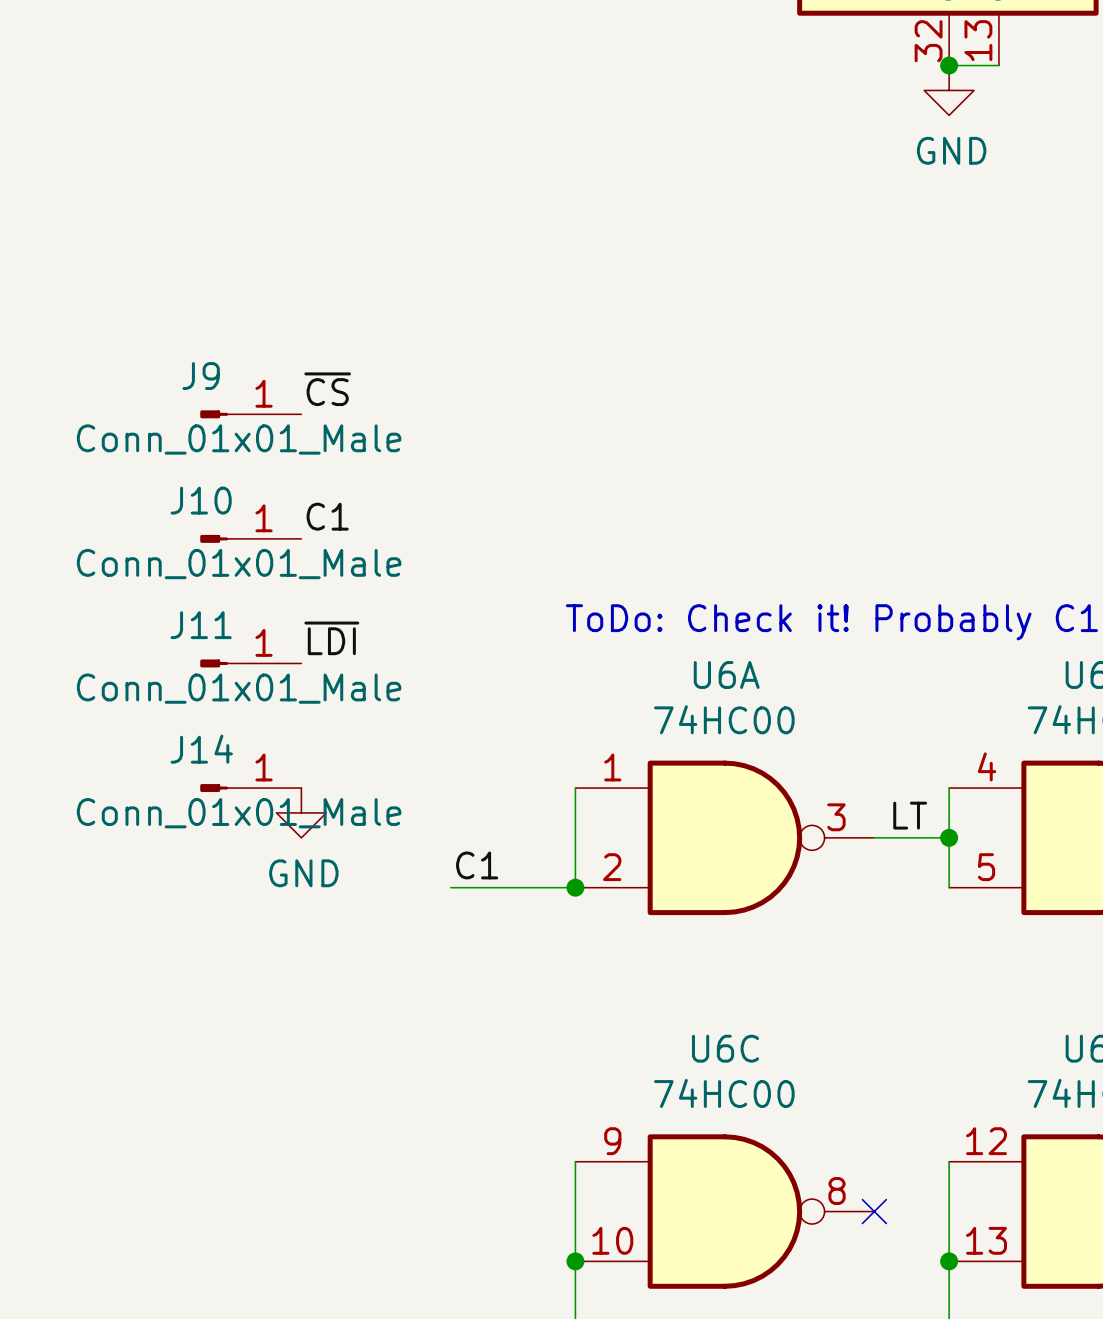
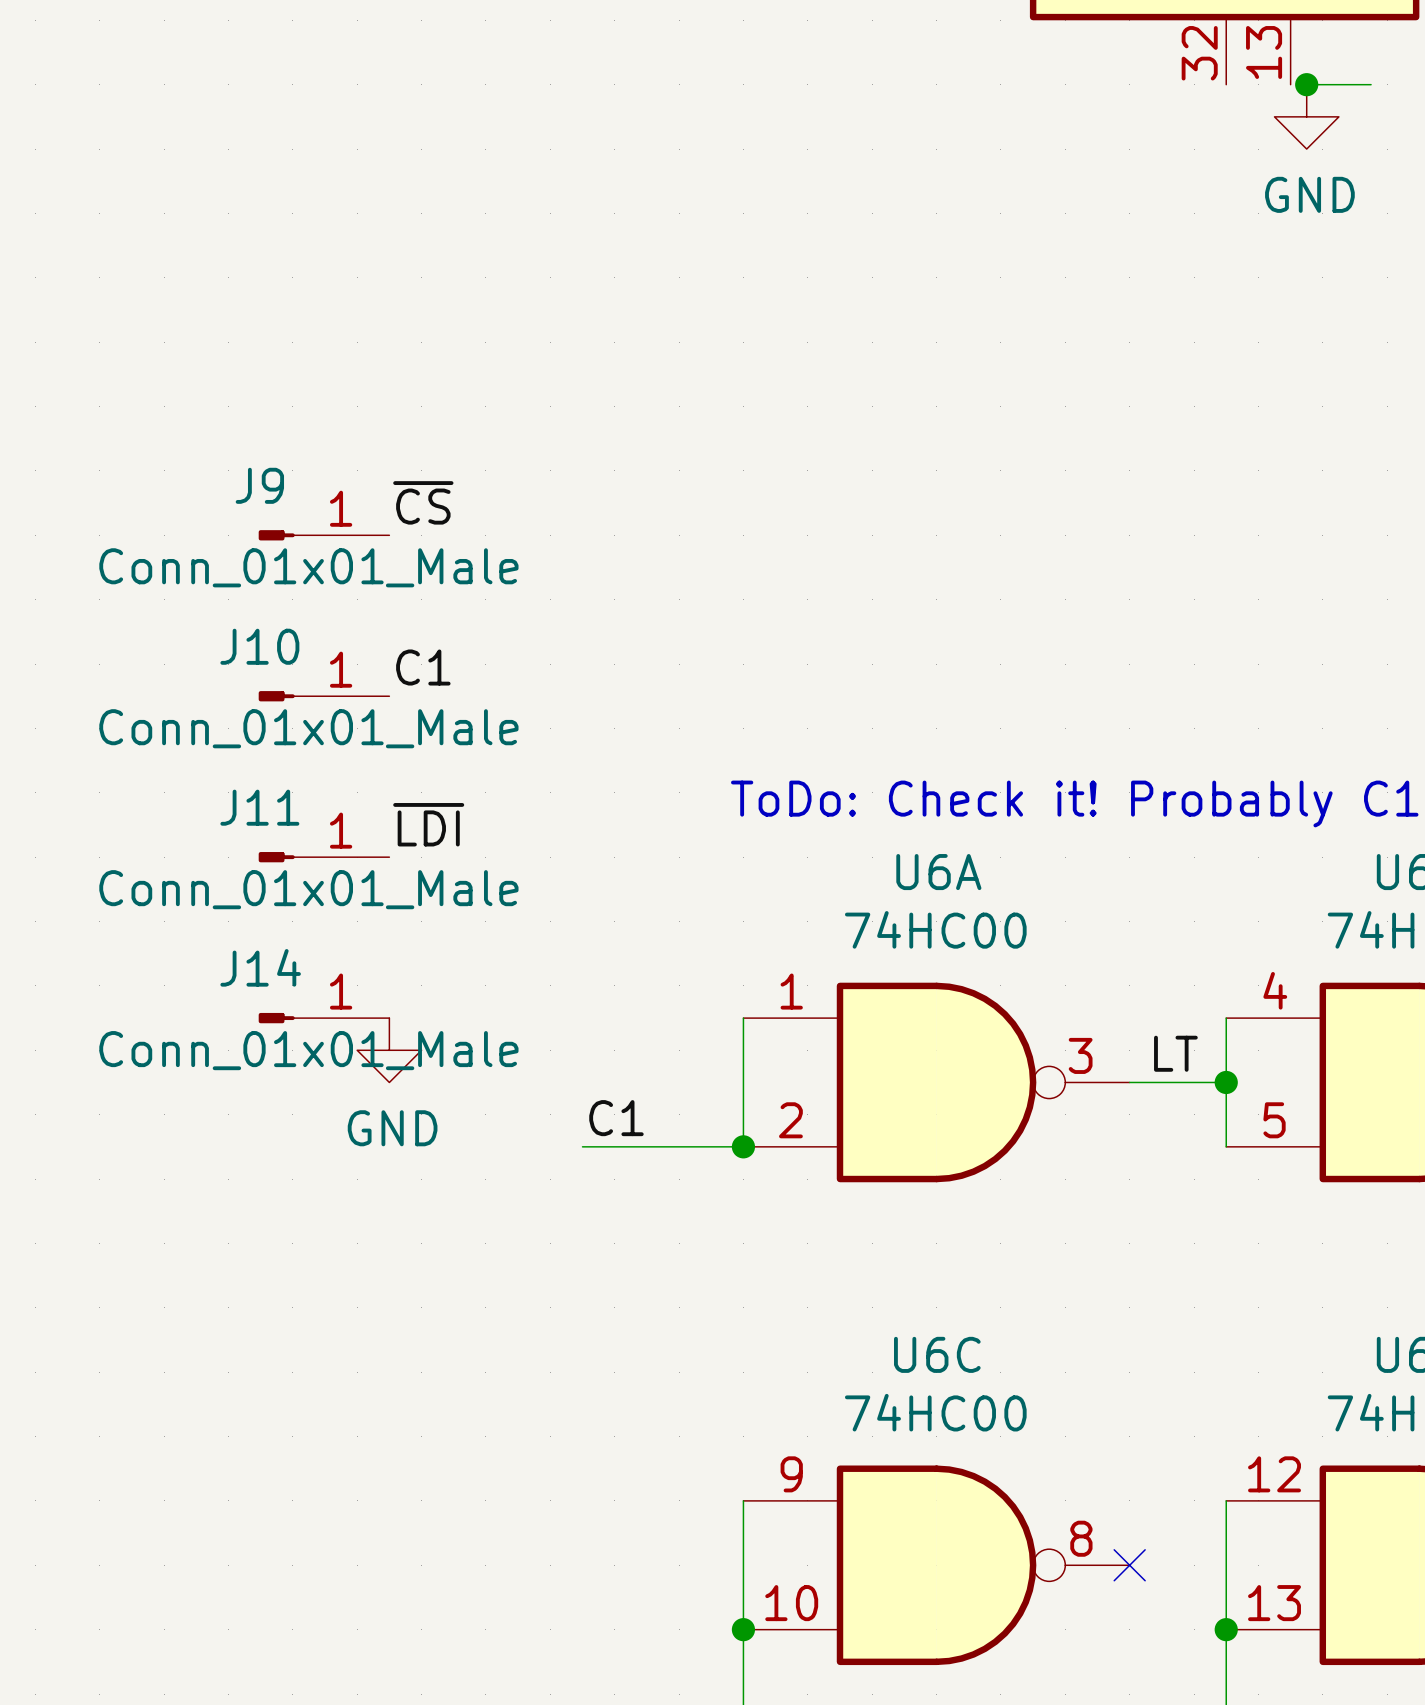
wire: (949, 65) (998, 65) -> (1306, 84) (1371, 84)
junction position: (949, 65) -> (1306, 84)
power symbol position: GND (949, 90) -> GND (1306, 116)

